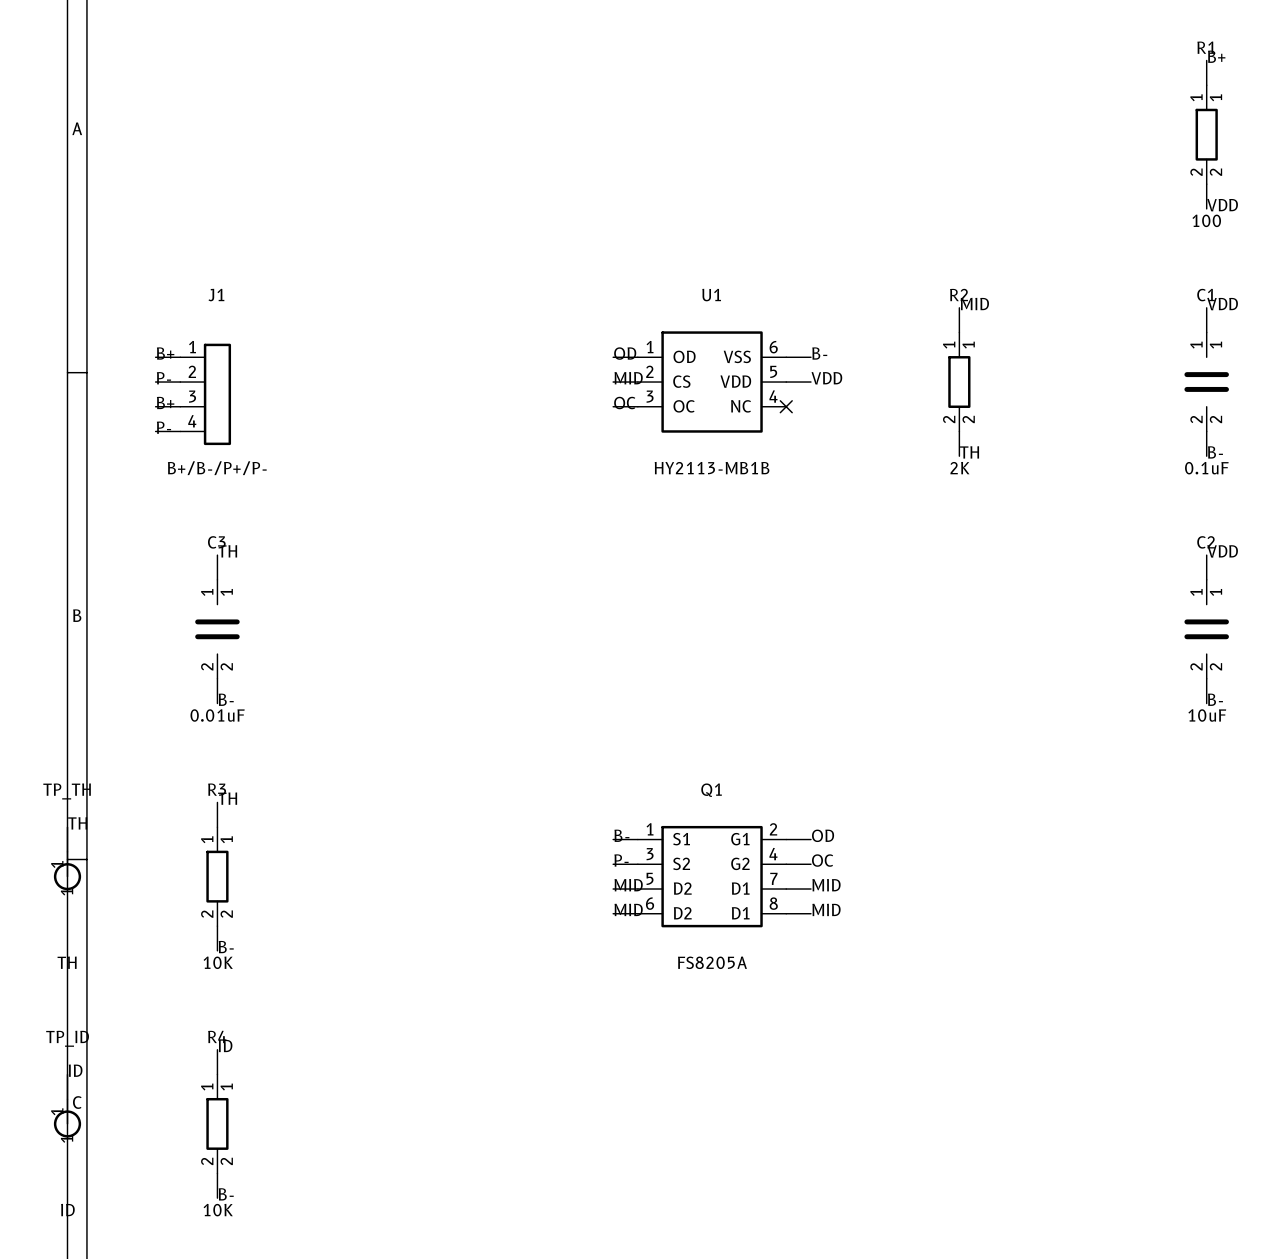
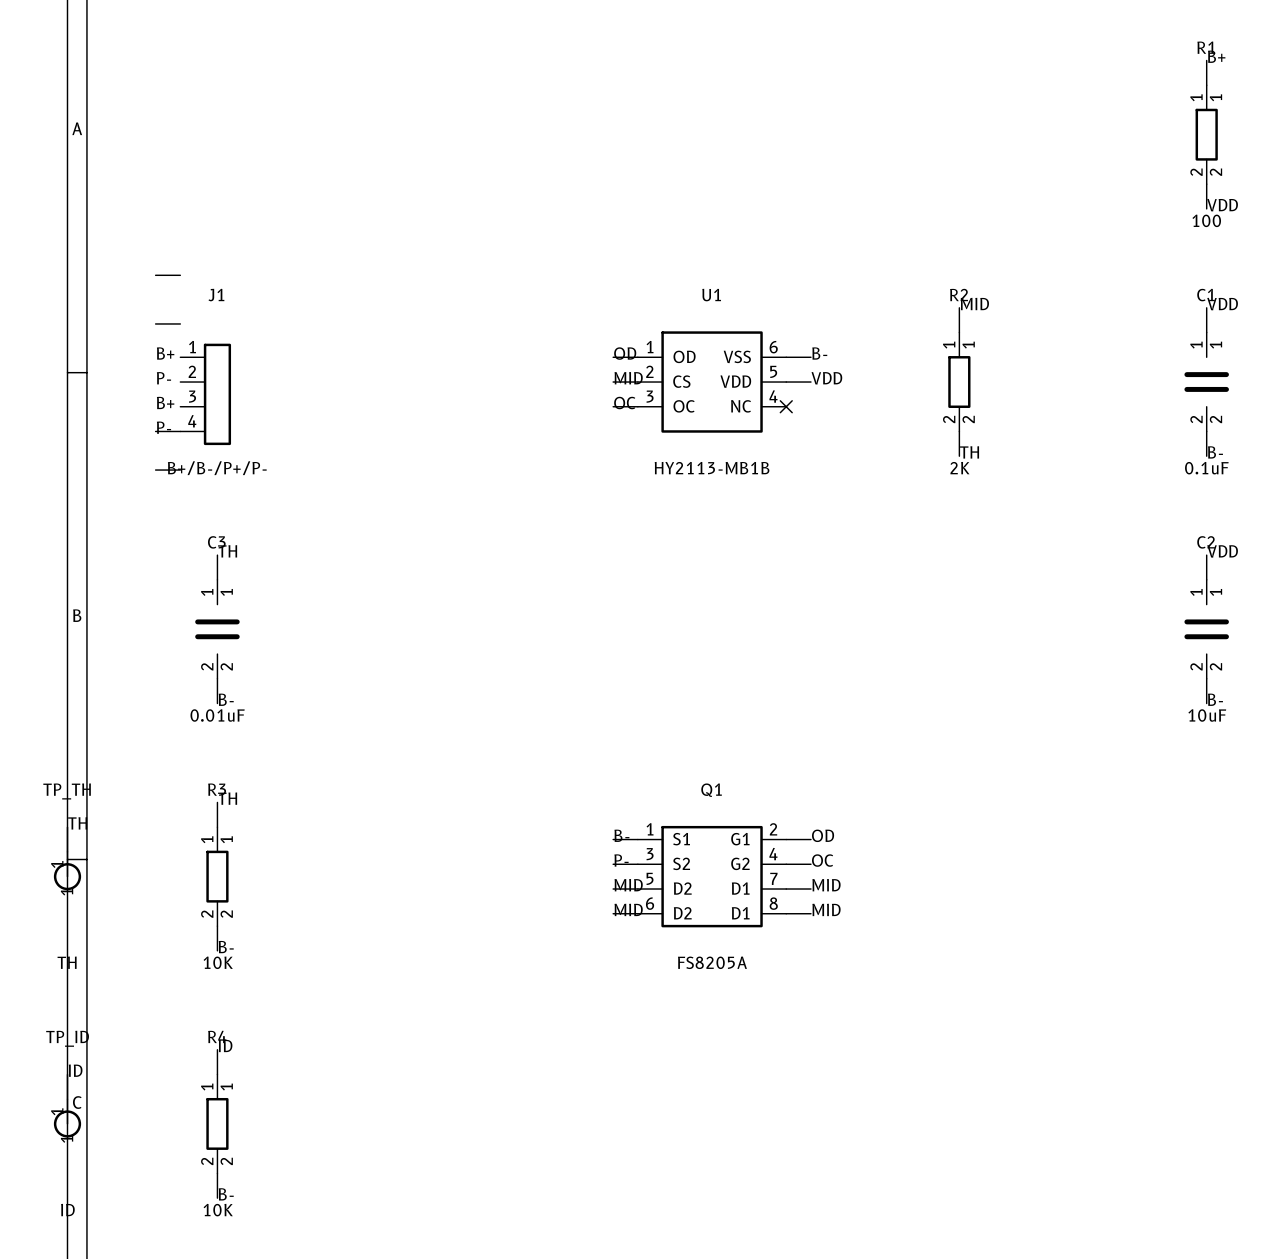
wire: (155, 357) (180, 357) -> (155, 323) (180, 323)
wire: (155, 382) (180, 382) -> (155, 275) (180, 275)
wire: (155, 406) (180, 406) -> (155, 470) (180, 470)

